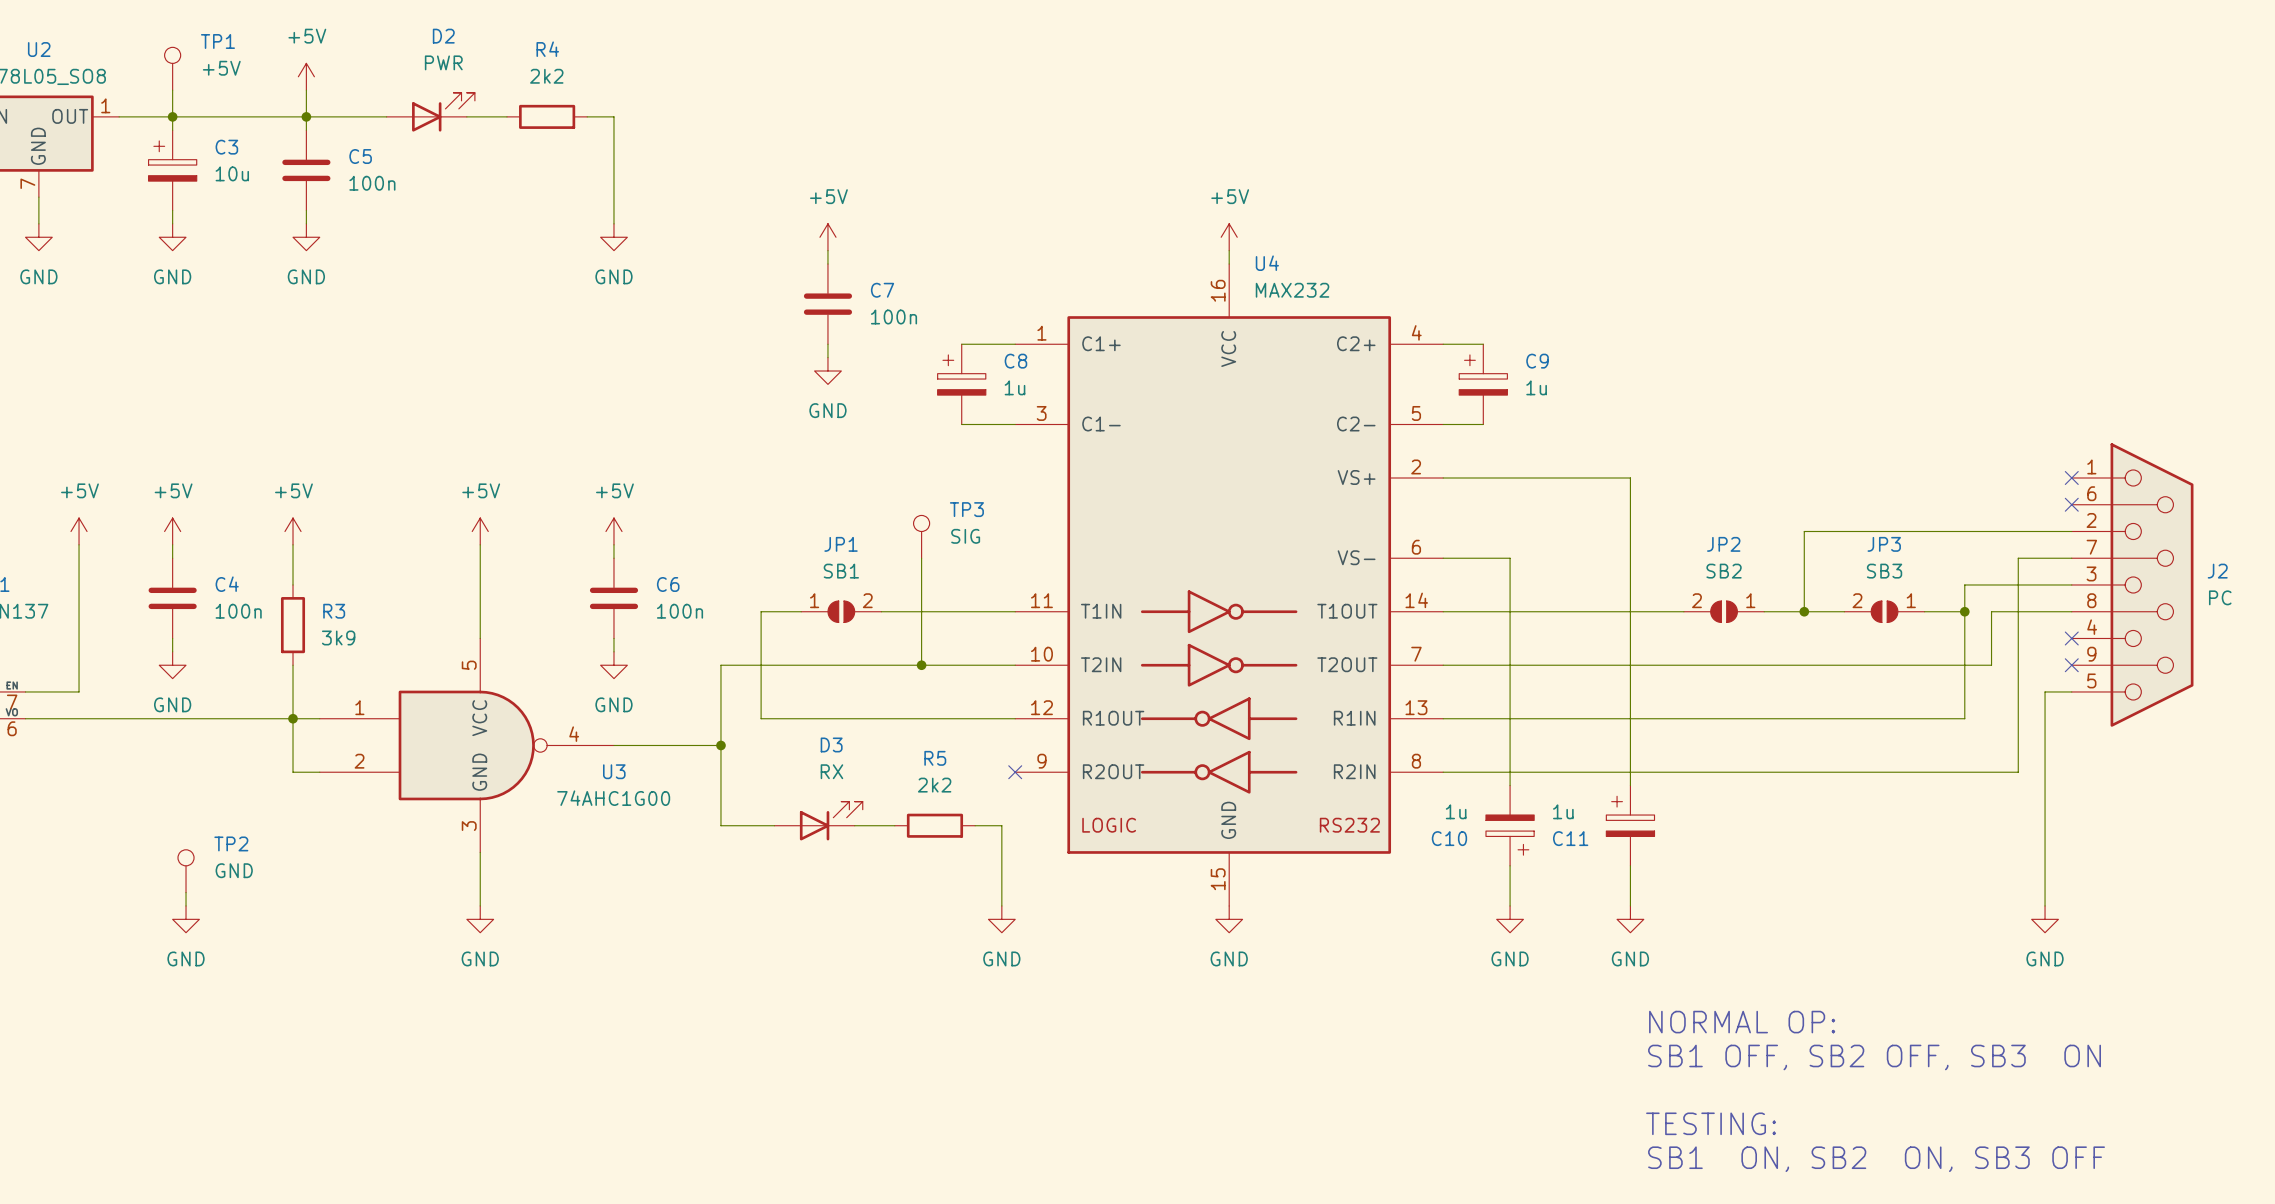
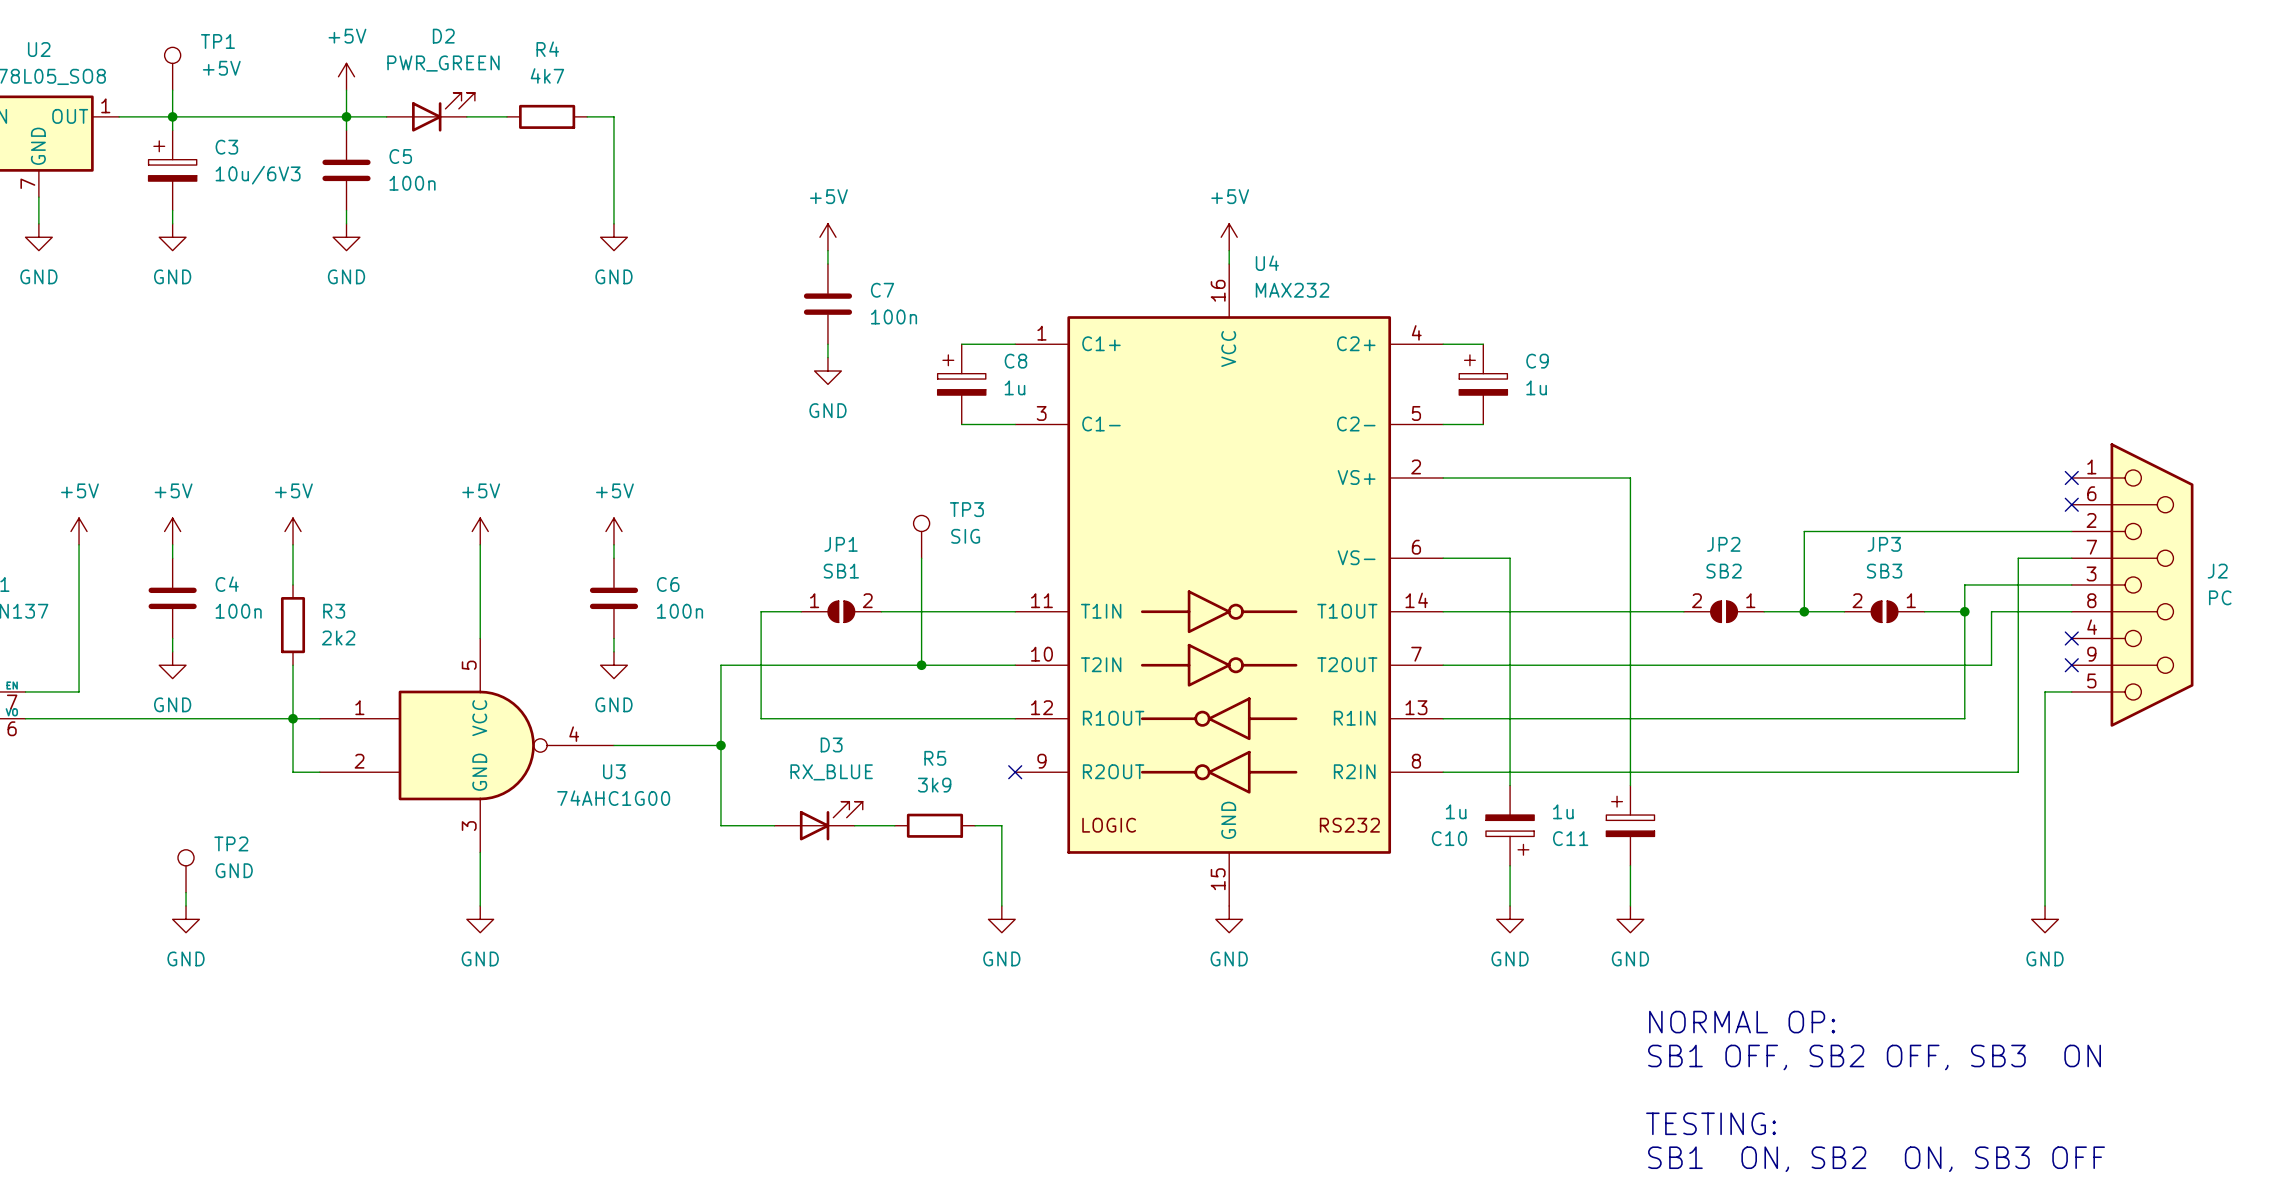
D2 value: PWR (443, 62) -> PWR_GREEN (443, 63)
power symbol position: +5V (306, 76) -> +5V (346, 76)
R4 value: 2k2 (546, 76) -> 4k7 (547, 75)
wire: (306, 90) (306, 130) -> (346, 90) (346, 130)
junction position: (306, 116) -> (346, 116)
C5 position: (306, 170) -> (346, 170)
C3 value: 10u (232, 173) -> 10u/6V3 (258, 175)
wire: (306, 210) (306, 223) -> (346, 210) (346, 223)
power symbol position: GND (306, 237) -> GND (346, 237)
R3 value: 3k9 (338, 637) -> 2k2 (338, 637)
D3 value: RX (831, 771) -> RX_BLUE (831, 772)
R5 value: 2k2 (934, 785) -> 3k9 (934, 785)

